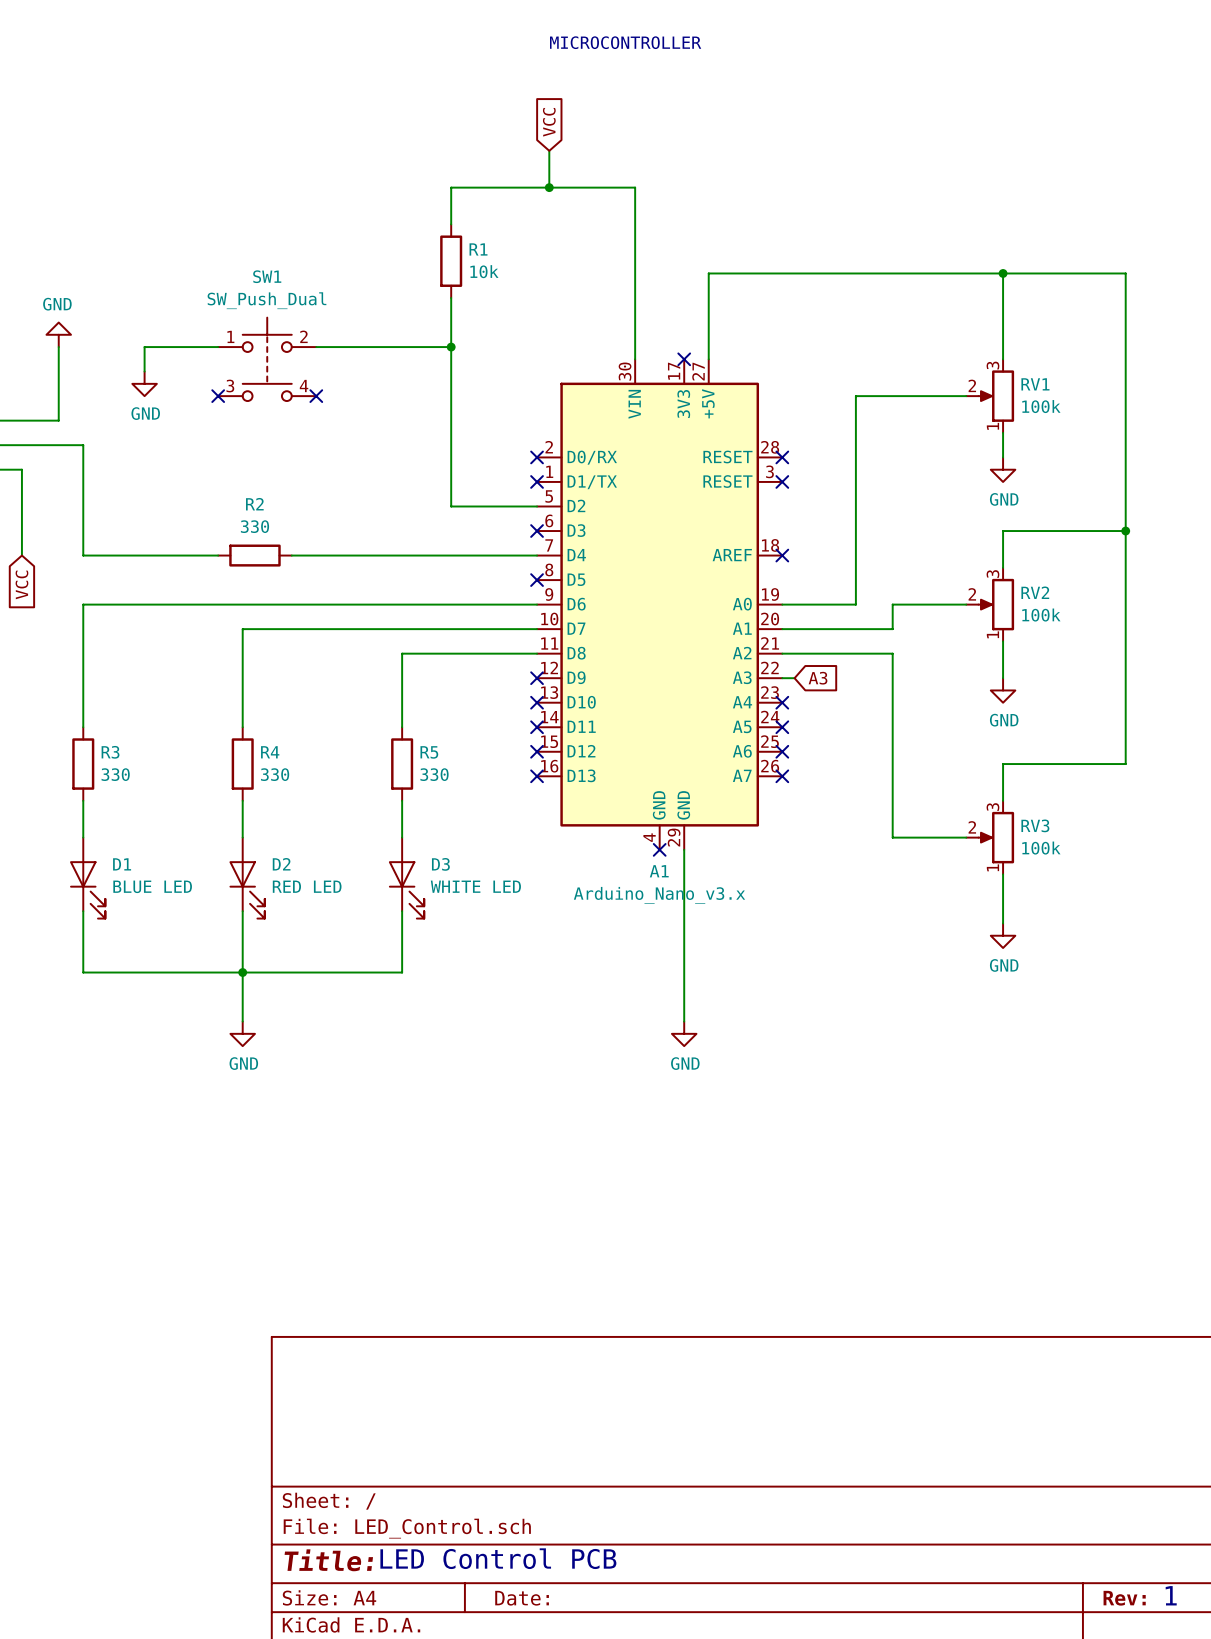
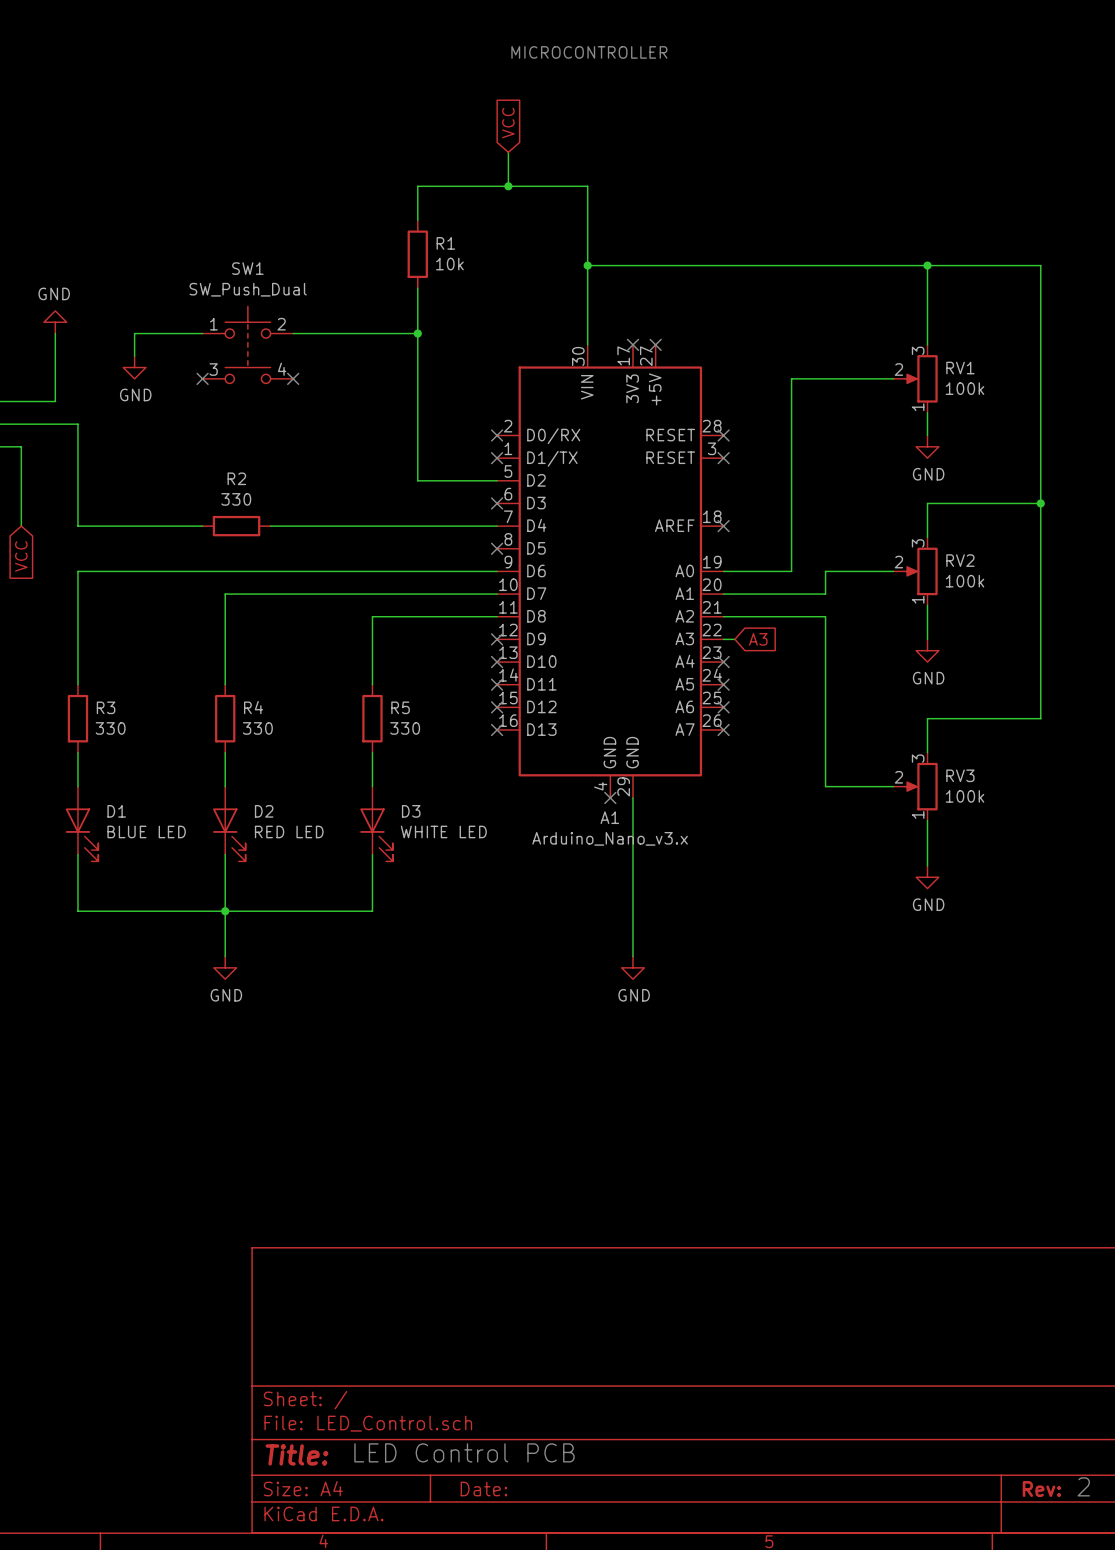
junction: none -> (587, 265)
wire: (708, 273) (708, 359) -> (655, 265) (587, 265)
no-connect mark: none -> (655, 344)
text: 1 (1171, 1595) -> 2 (1083, 1486)

